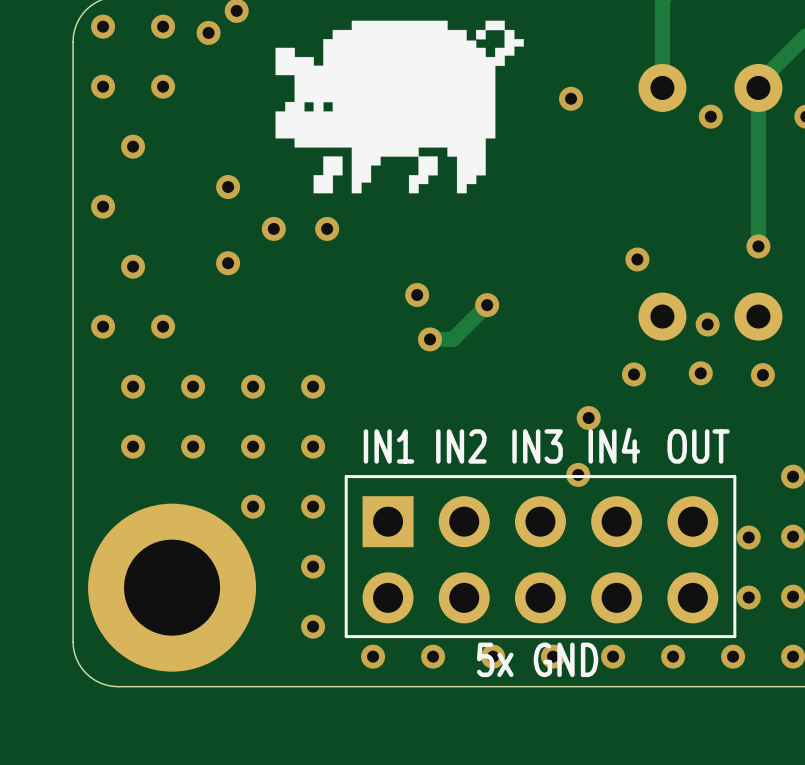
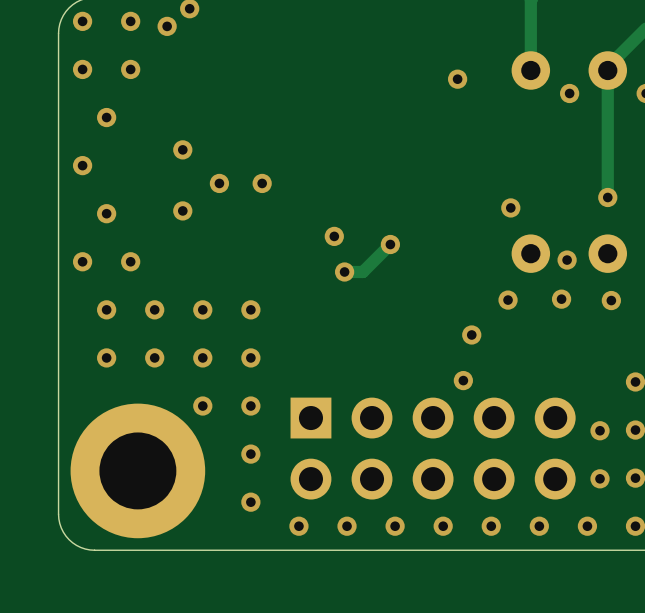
drawing: [275, 20, 524, 194] -> none
text: IN4 (614, 445) -> none
text: IN1 (388, 446) -> none
text: IN2 (461, 446) -> none
text: IN3 (537, 446) -> none
text: OUT (698, 446) -> none
line: (734, 476) (346, 476) (346, 636) (734, 636) (734, 476) -> none
text: 5x GND (537, 659) -> none

